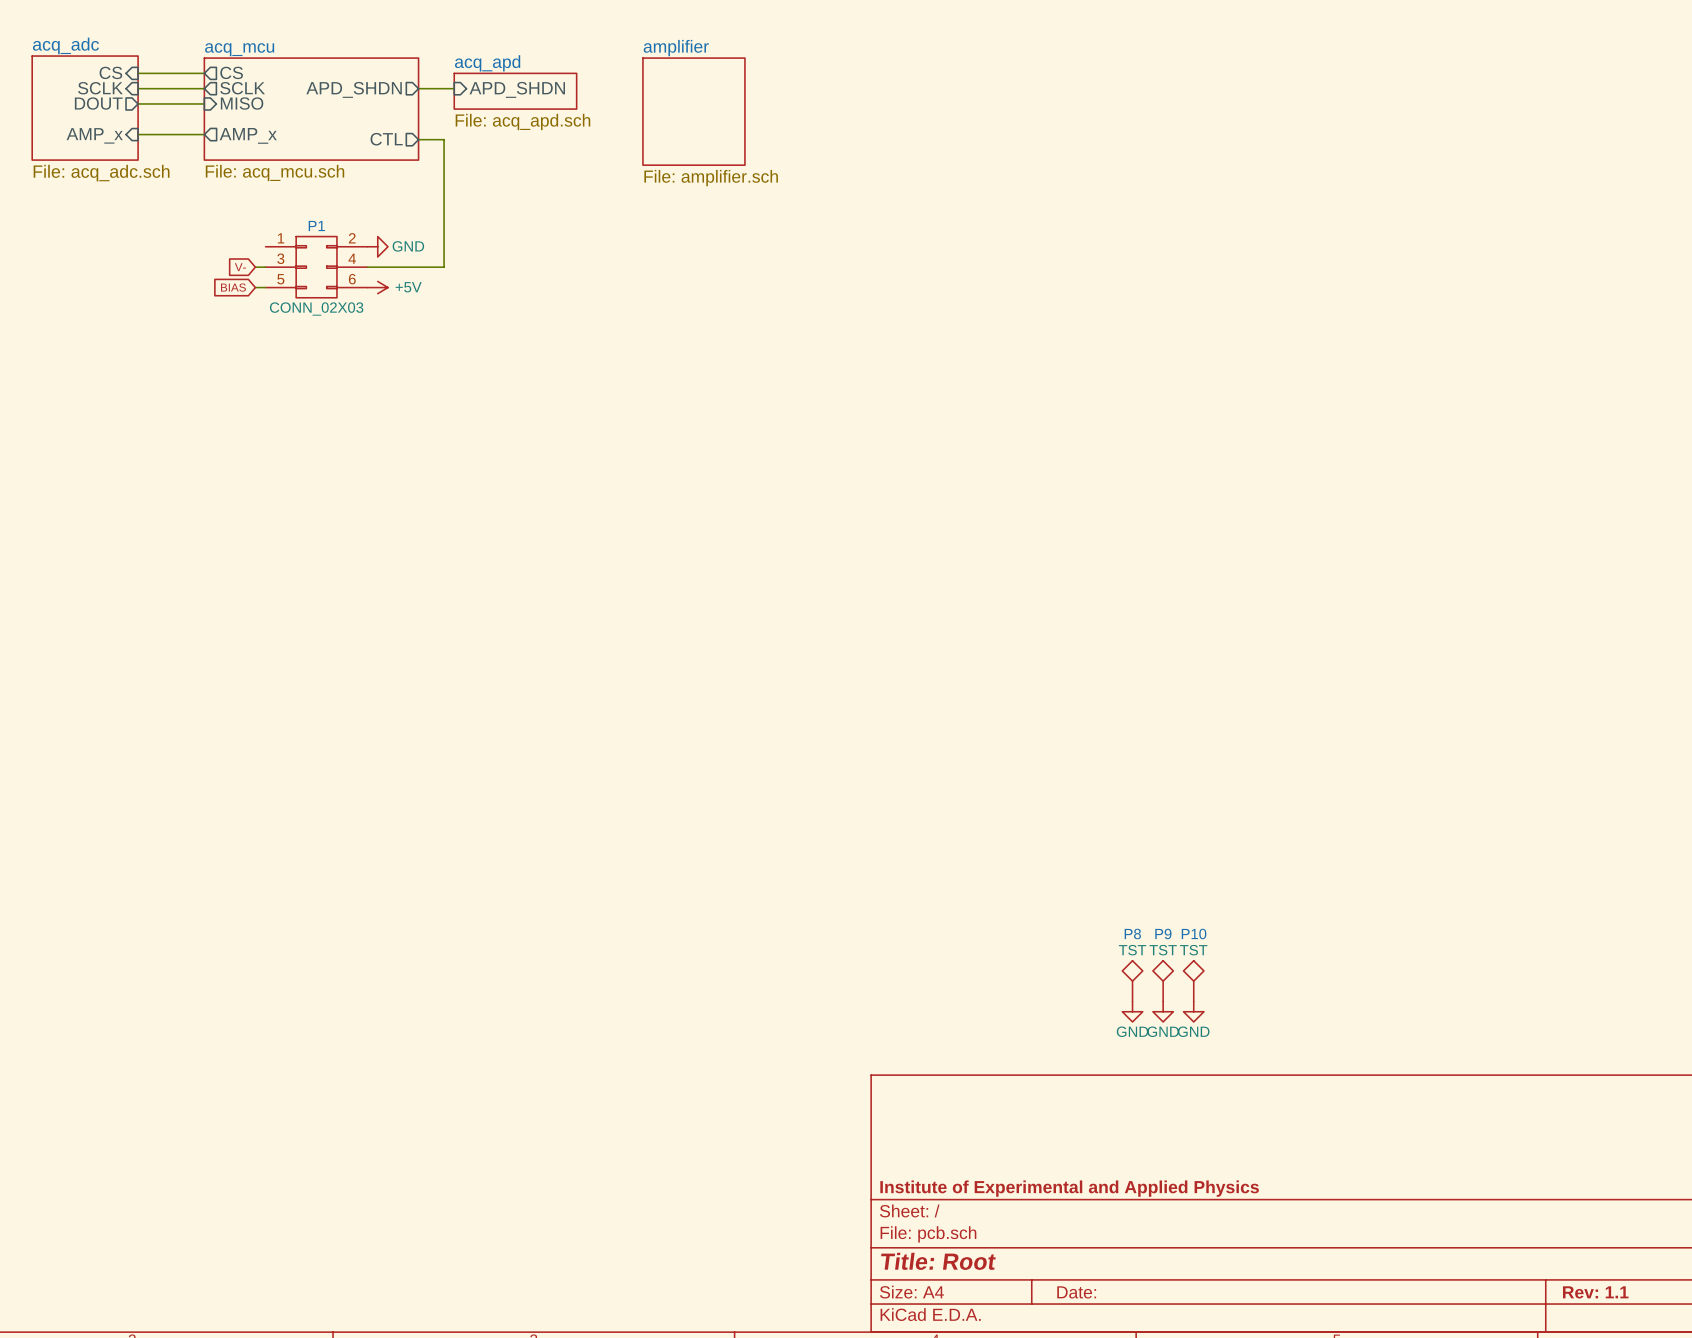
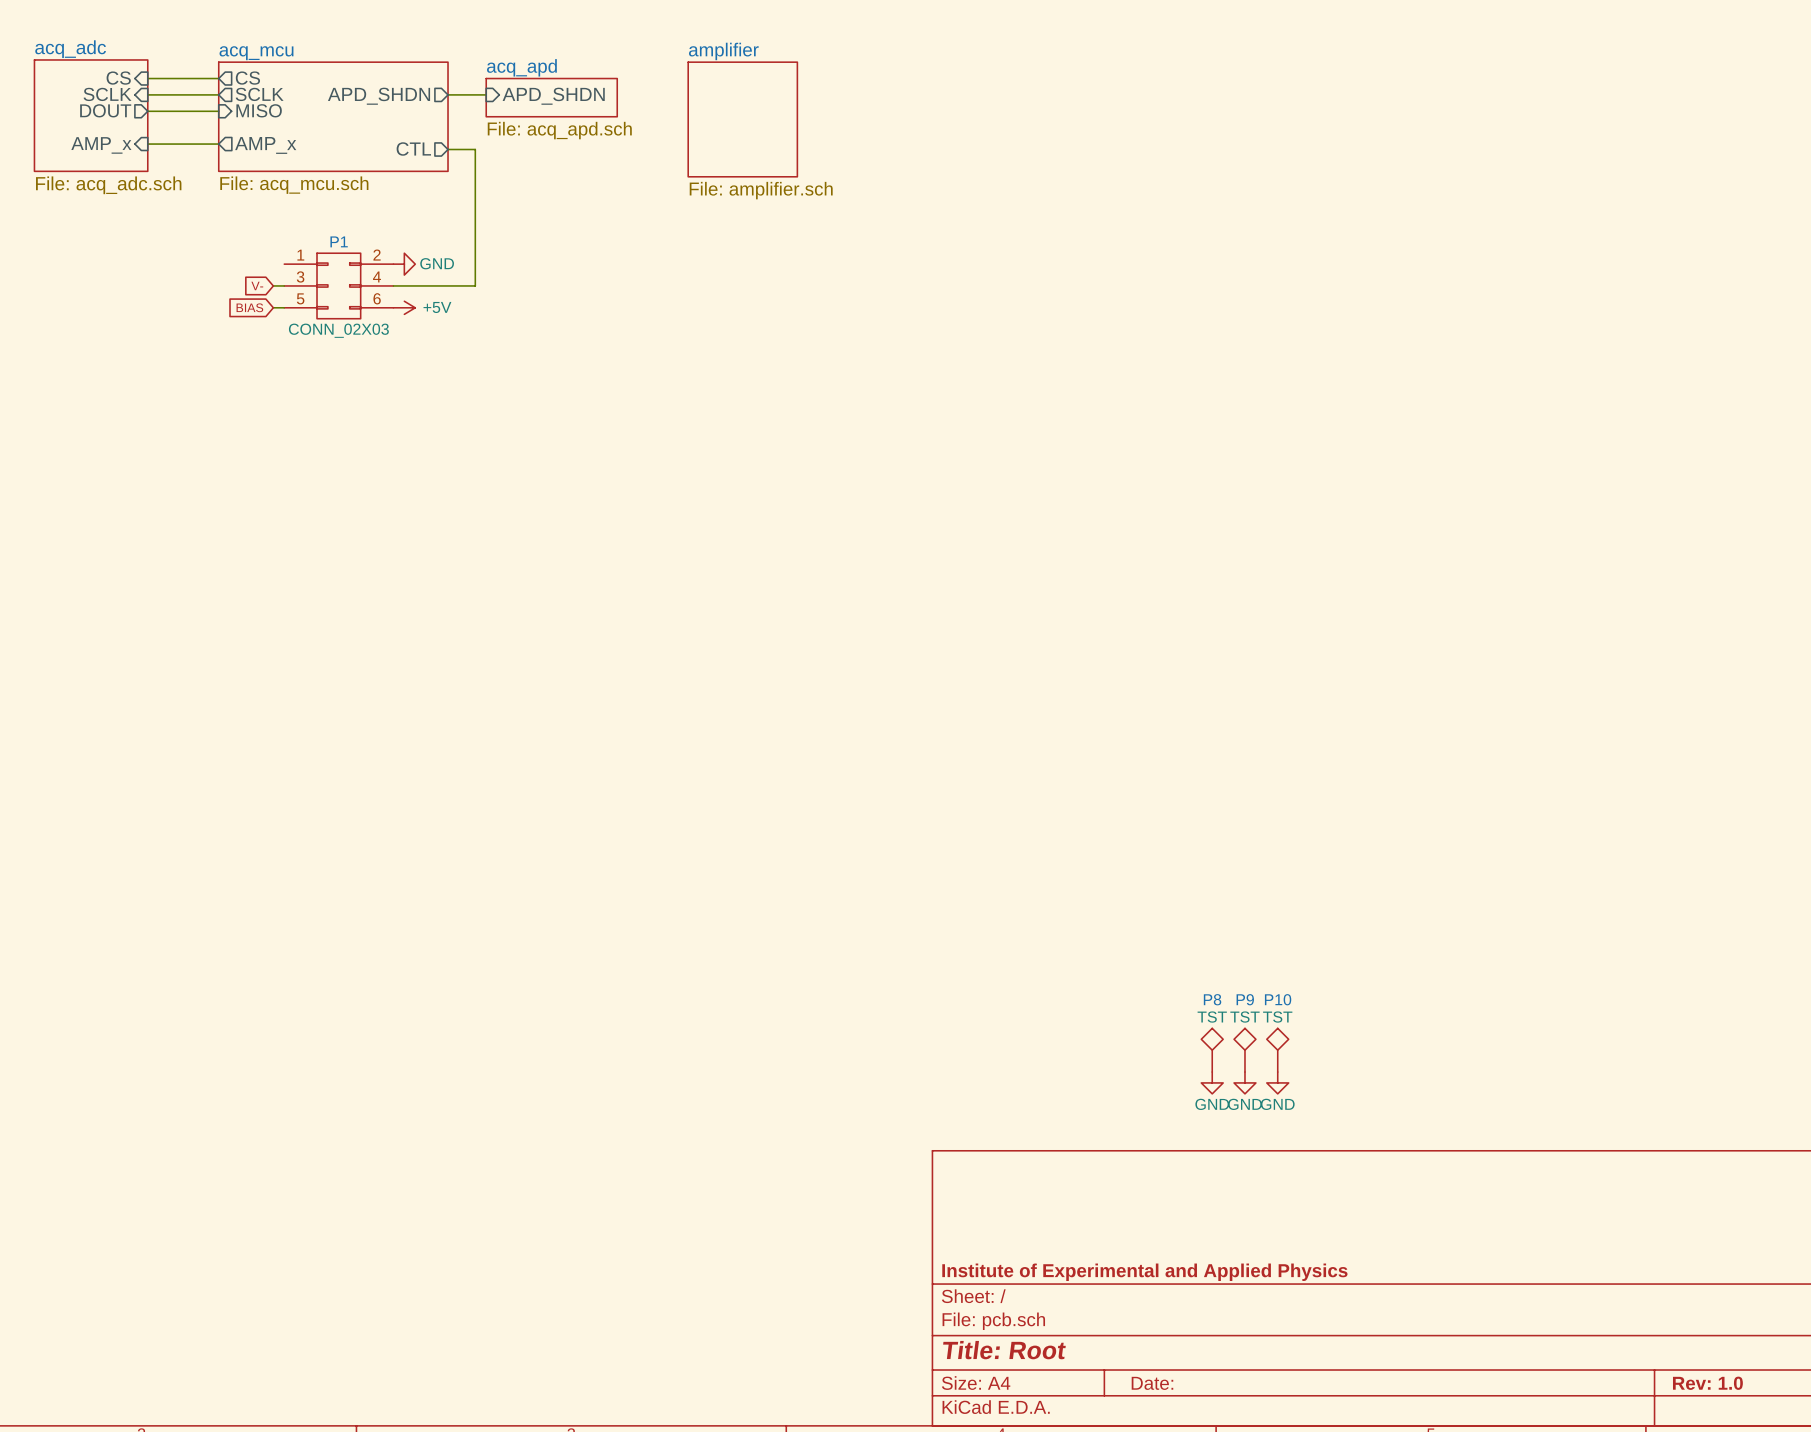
title block: Rev: 1.1 (1595, 1292) -> Rev: 1.0 (1707, 1383)

